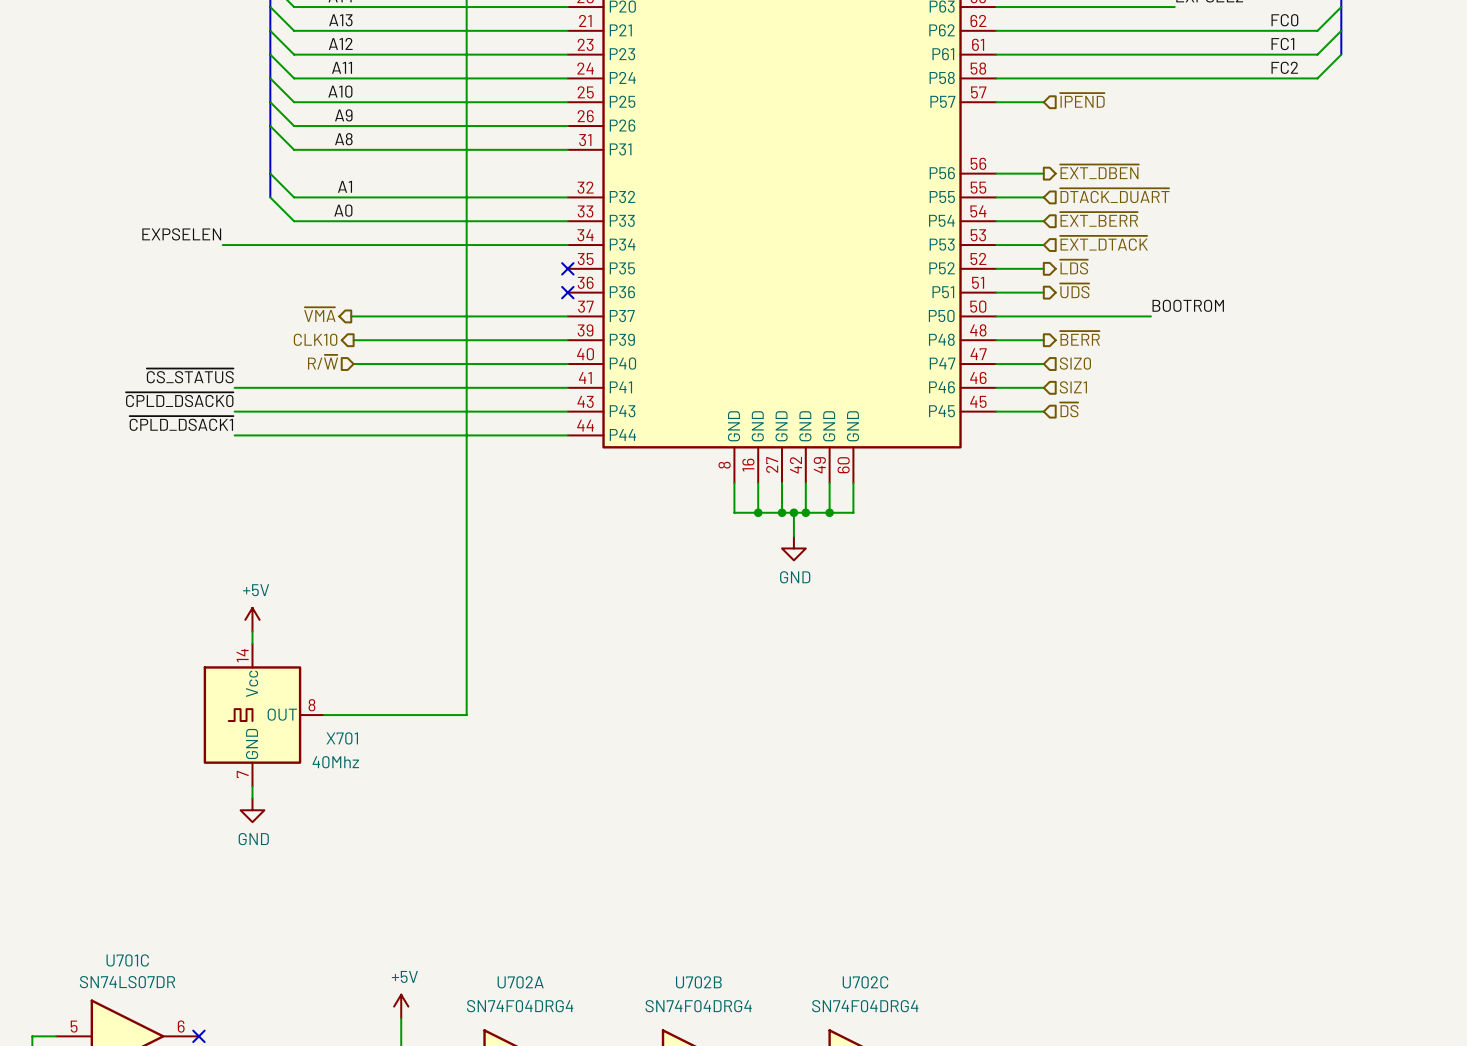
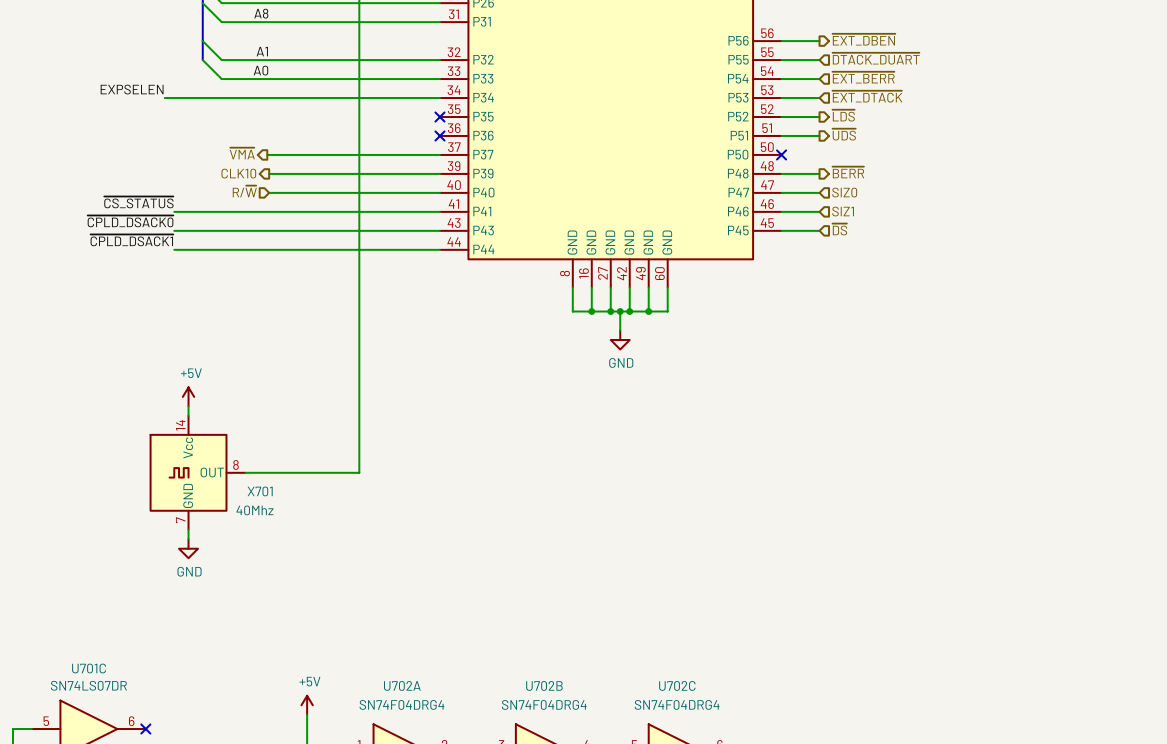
label: BOOTROM (1188, 305) -> none
wire: (996, 316) (1150, 316) -> none
no-connect mark: none -> (781, 154)

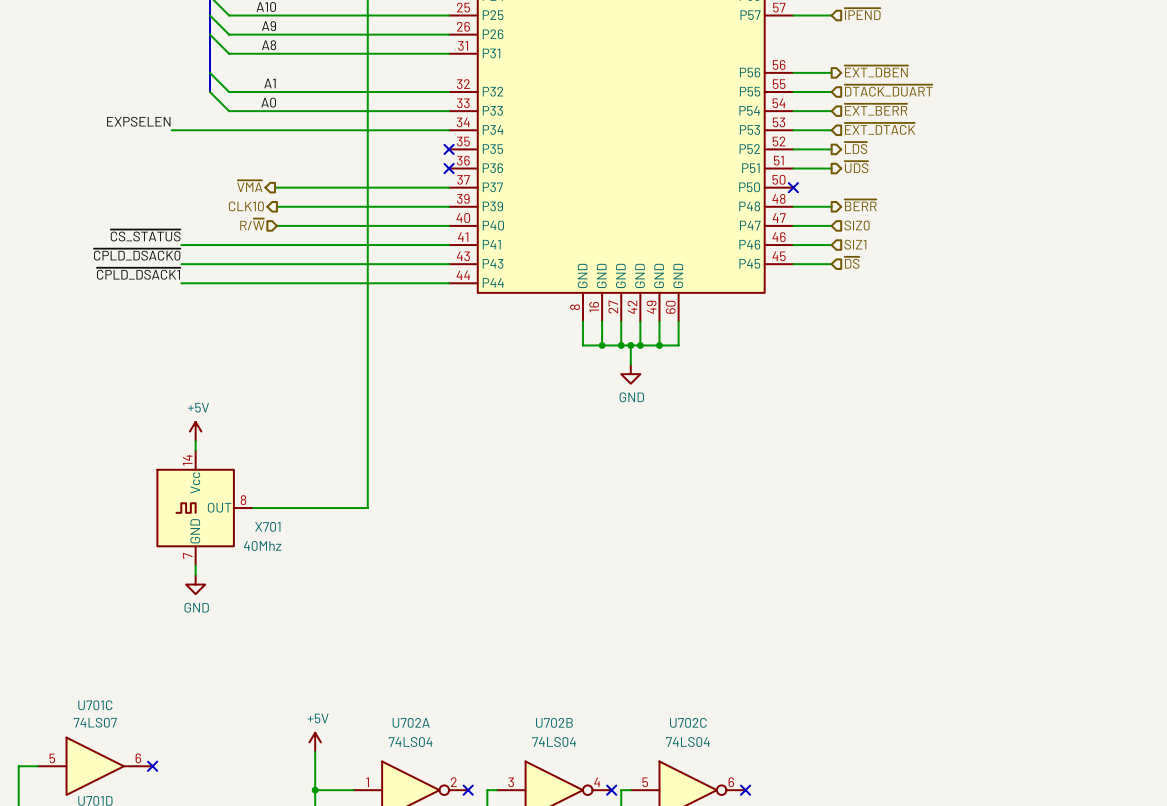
U701C value: SN74LS07DR (88, 685) -> 74LS07 (95, 722)
U702A value: SN74F04DRG4 (401, 704) -> 74LS04 (410, 742)
U702B value: SN74F04DRG4 (544, 704) -> 74LS04 (554, 742)
U702C value: SN74F04DRG4 (677, 704) -> 74LS04 (688, 742)

